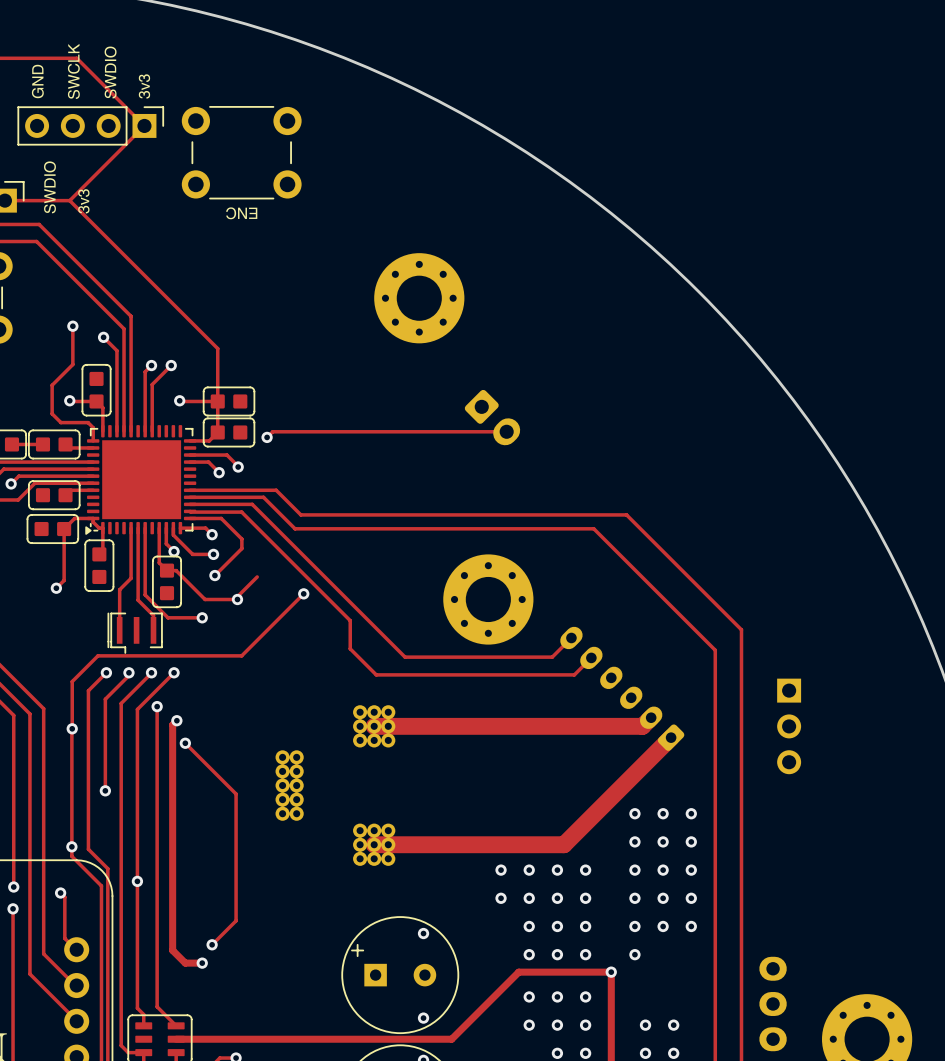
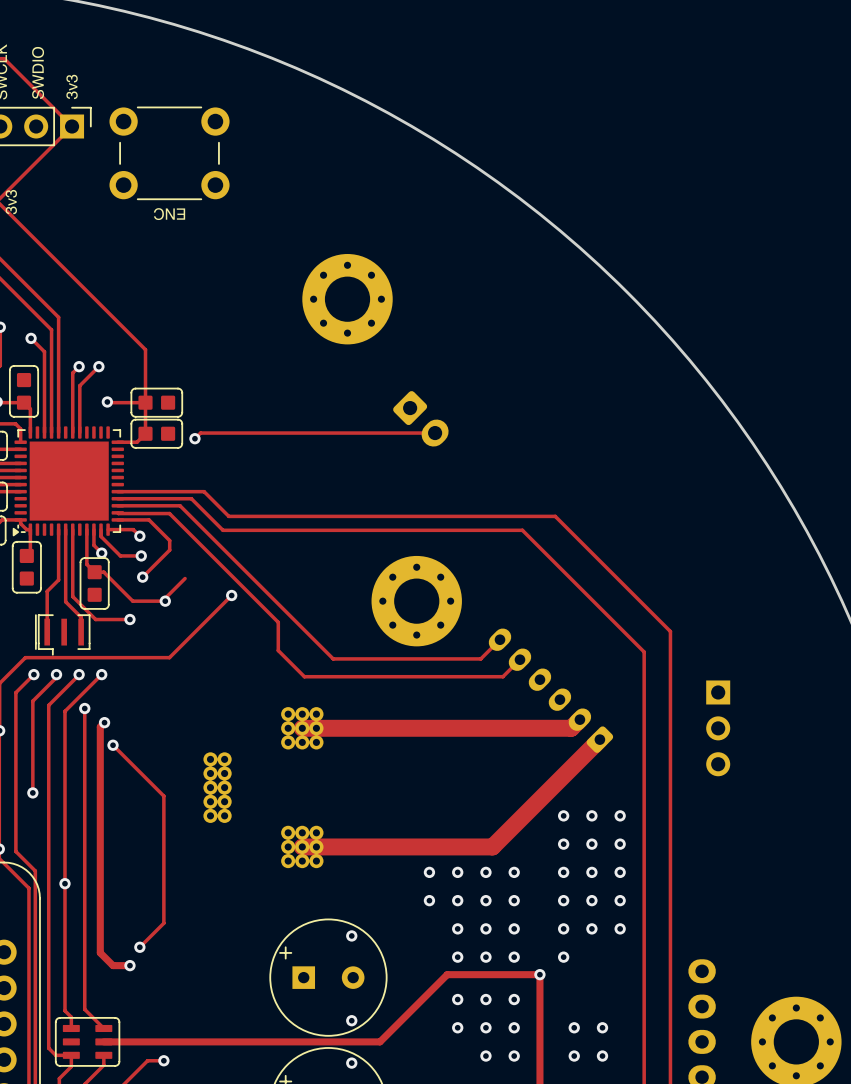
track: (190, 455) (226, 455) (238, 467) -> none
track: (190, 462) (208, 462) (219, 472) -> none
via: (238, 467) -> none
via: (219, 472) -> none

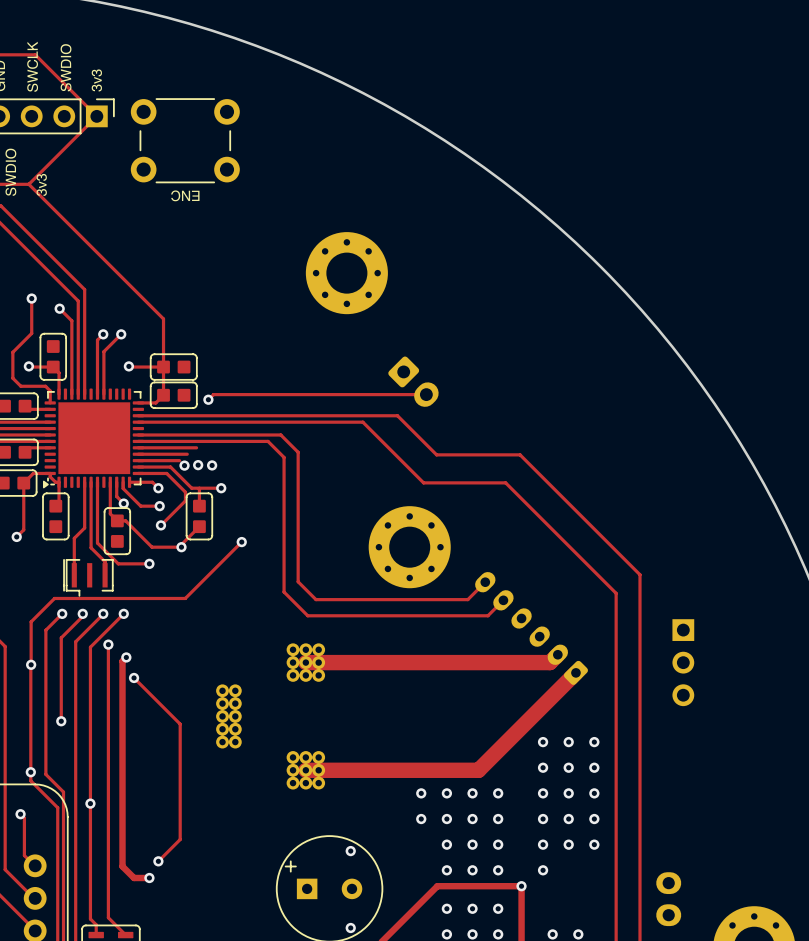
track: (181, 491) (204, 491) (228, 516) (555, 516) -> (138, 415) (397, 415) (436, 454) (520, 454) (535, 470)
track: (171, 498) (191, 498) (222, 530) (432, 530) -> (138, 422) (362, 422) (423, 482)
track: (163, 505) (180, 505) (333, 658) -> (138, 434) (280, 434) (298, 452) (298, 581) (315, 599) (333, 599)
via: none -> (198, 465)
via: none -> (184, 465)
via: none -> (212, 465)
track: (117, 512) (169, 513) (278, 622) -> (138, 441) (268, 441) (284, 457) (284, 566)
track: none -> (138, 467) (170, 467) (191, 488) (221, 488)
track: none -> (199, 488) (199, 506)
via: none -> (221, 488)
part: none -> (199, 516)

